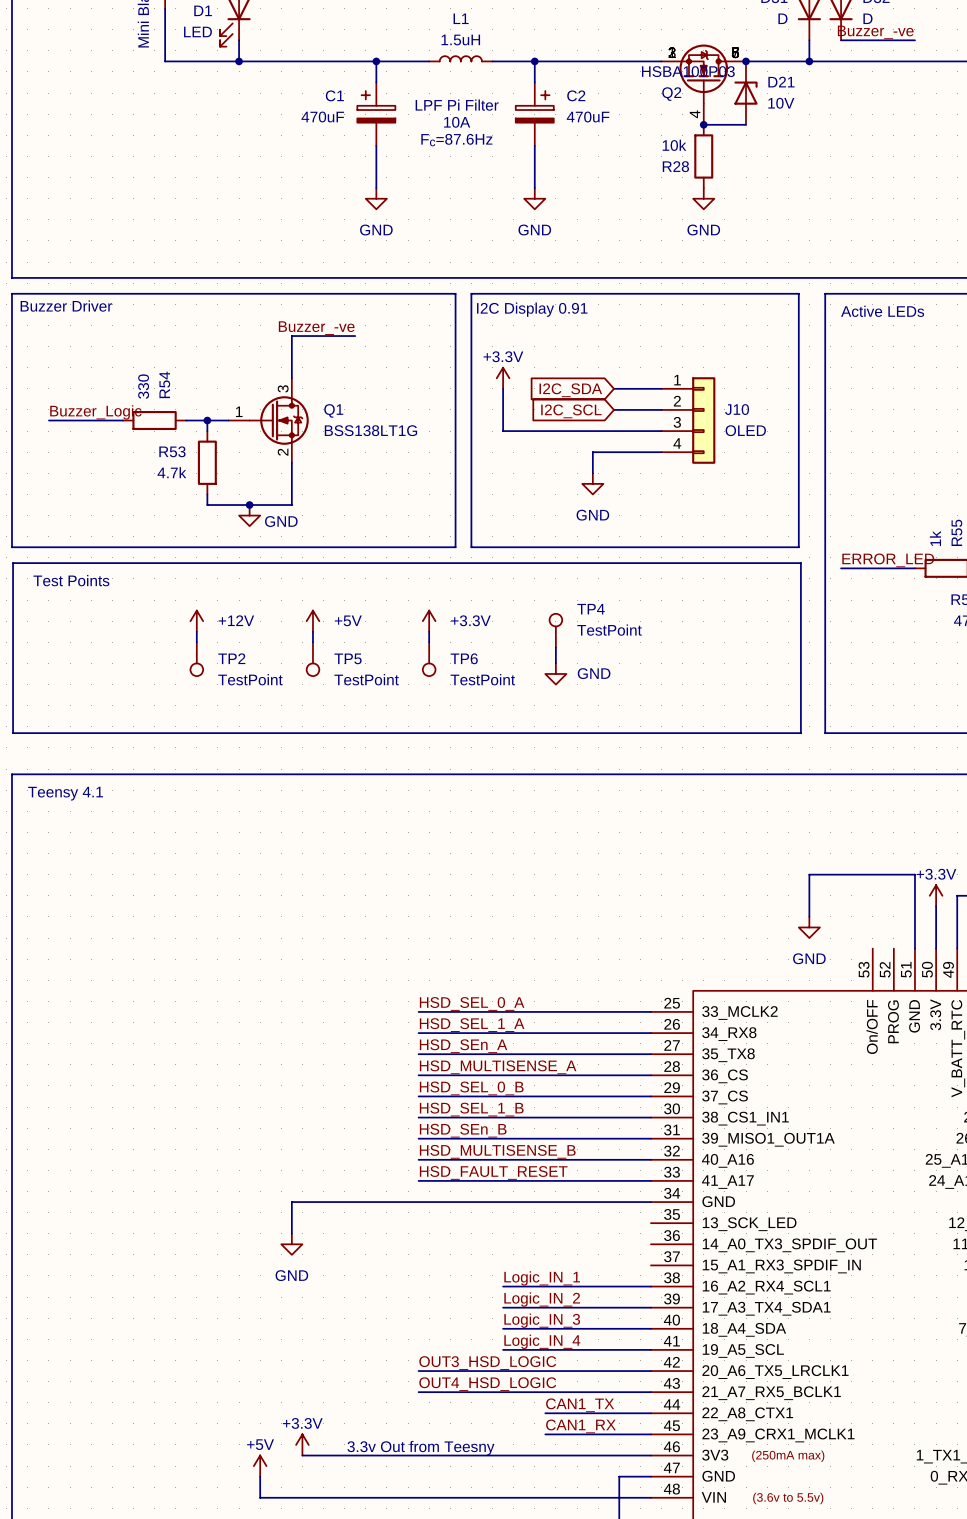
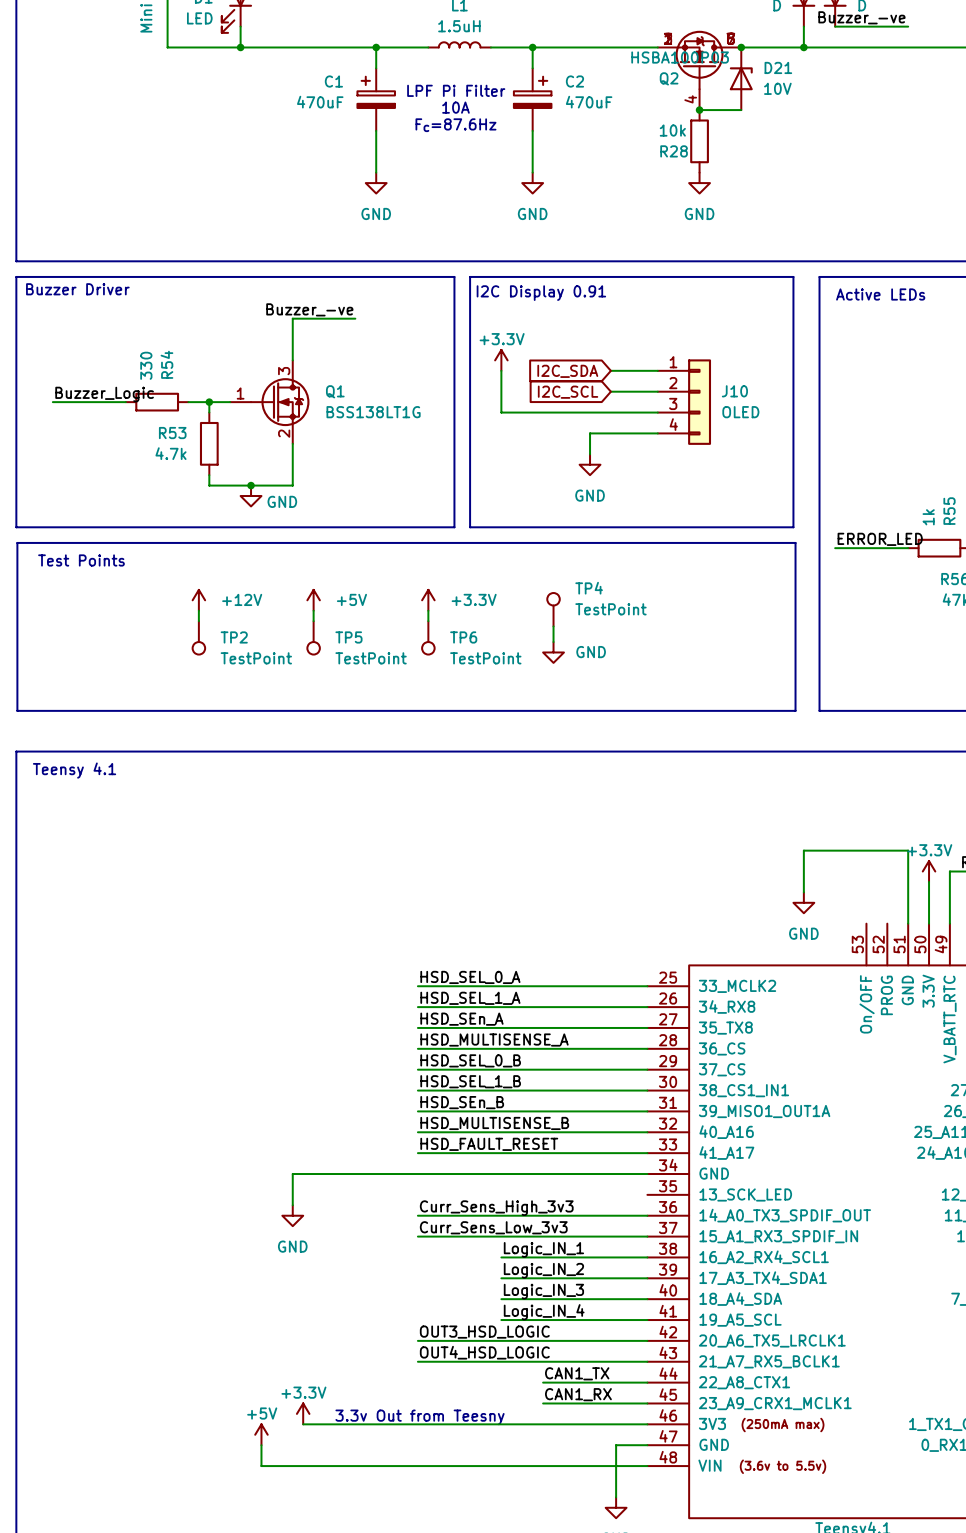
label: none -> Curr_Sens_High_3v3 (496, 1208)
wire: none -> (417, 1215) (647, 1215)
label: none -> Curr_Sens_Low_3v3 (493, 1227)
wire: none -> (417, 1236) (647, 1236)

